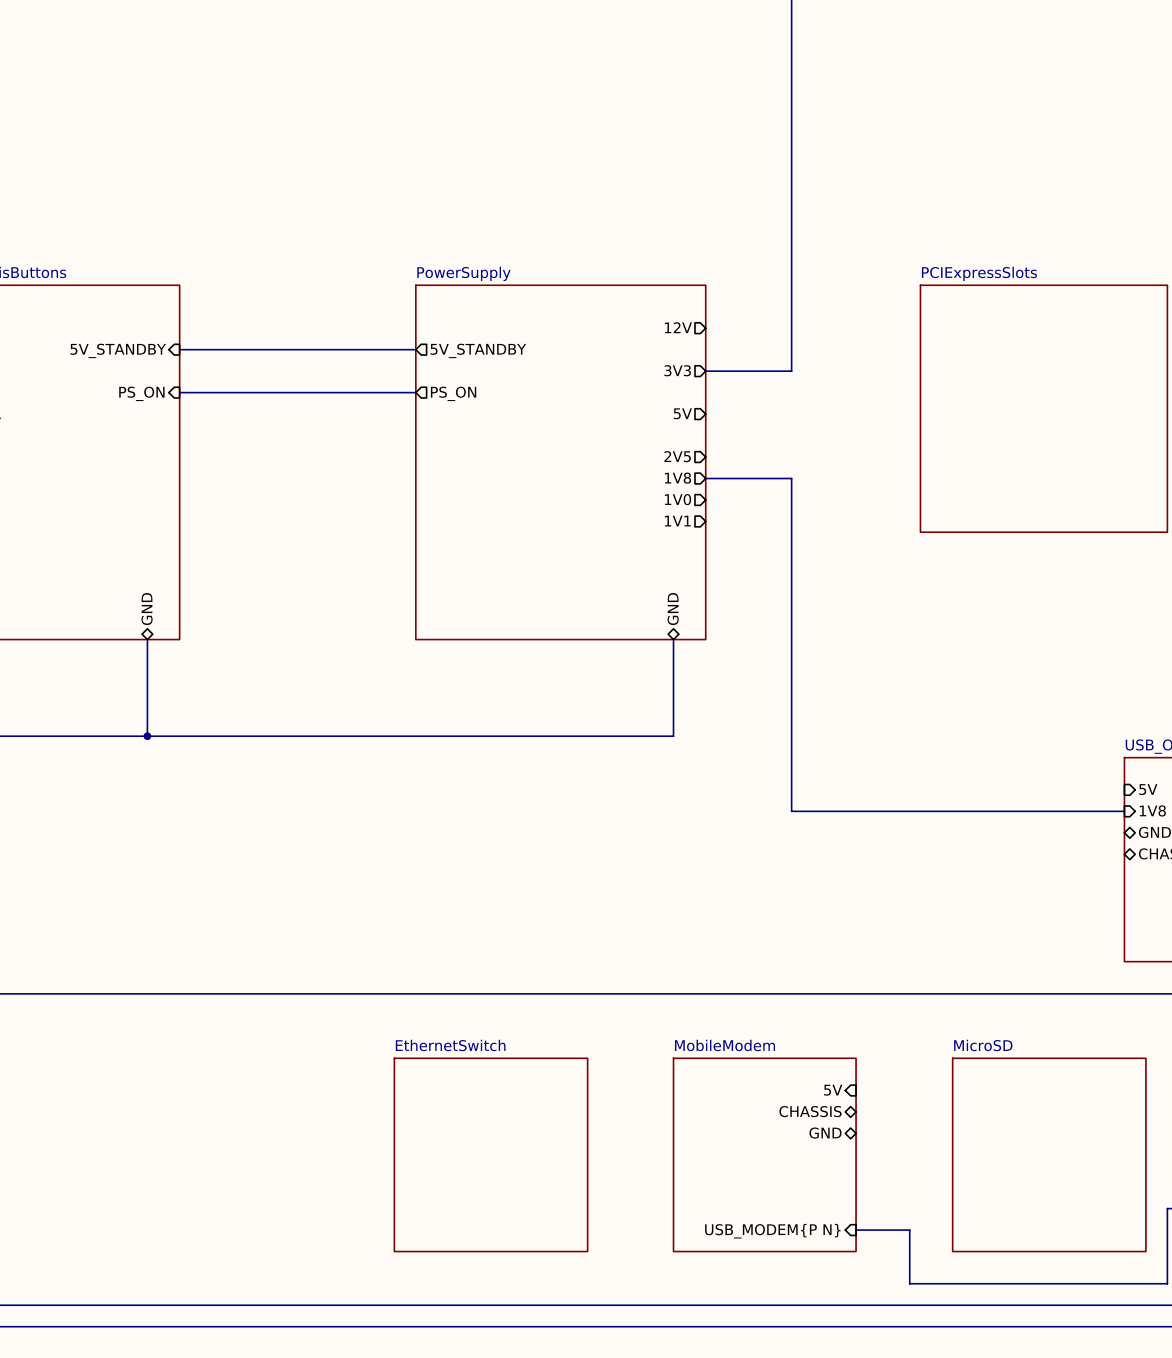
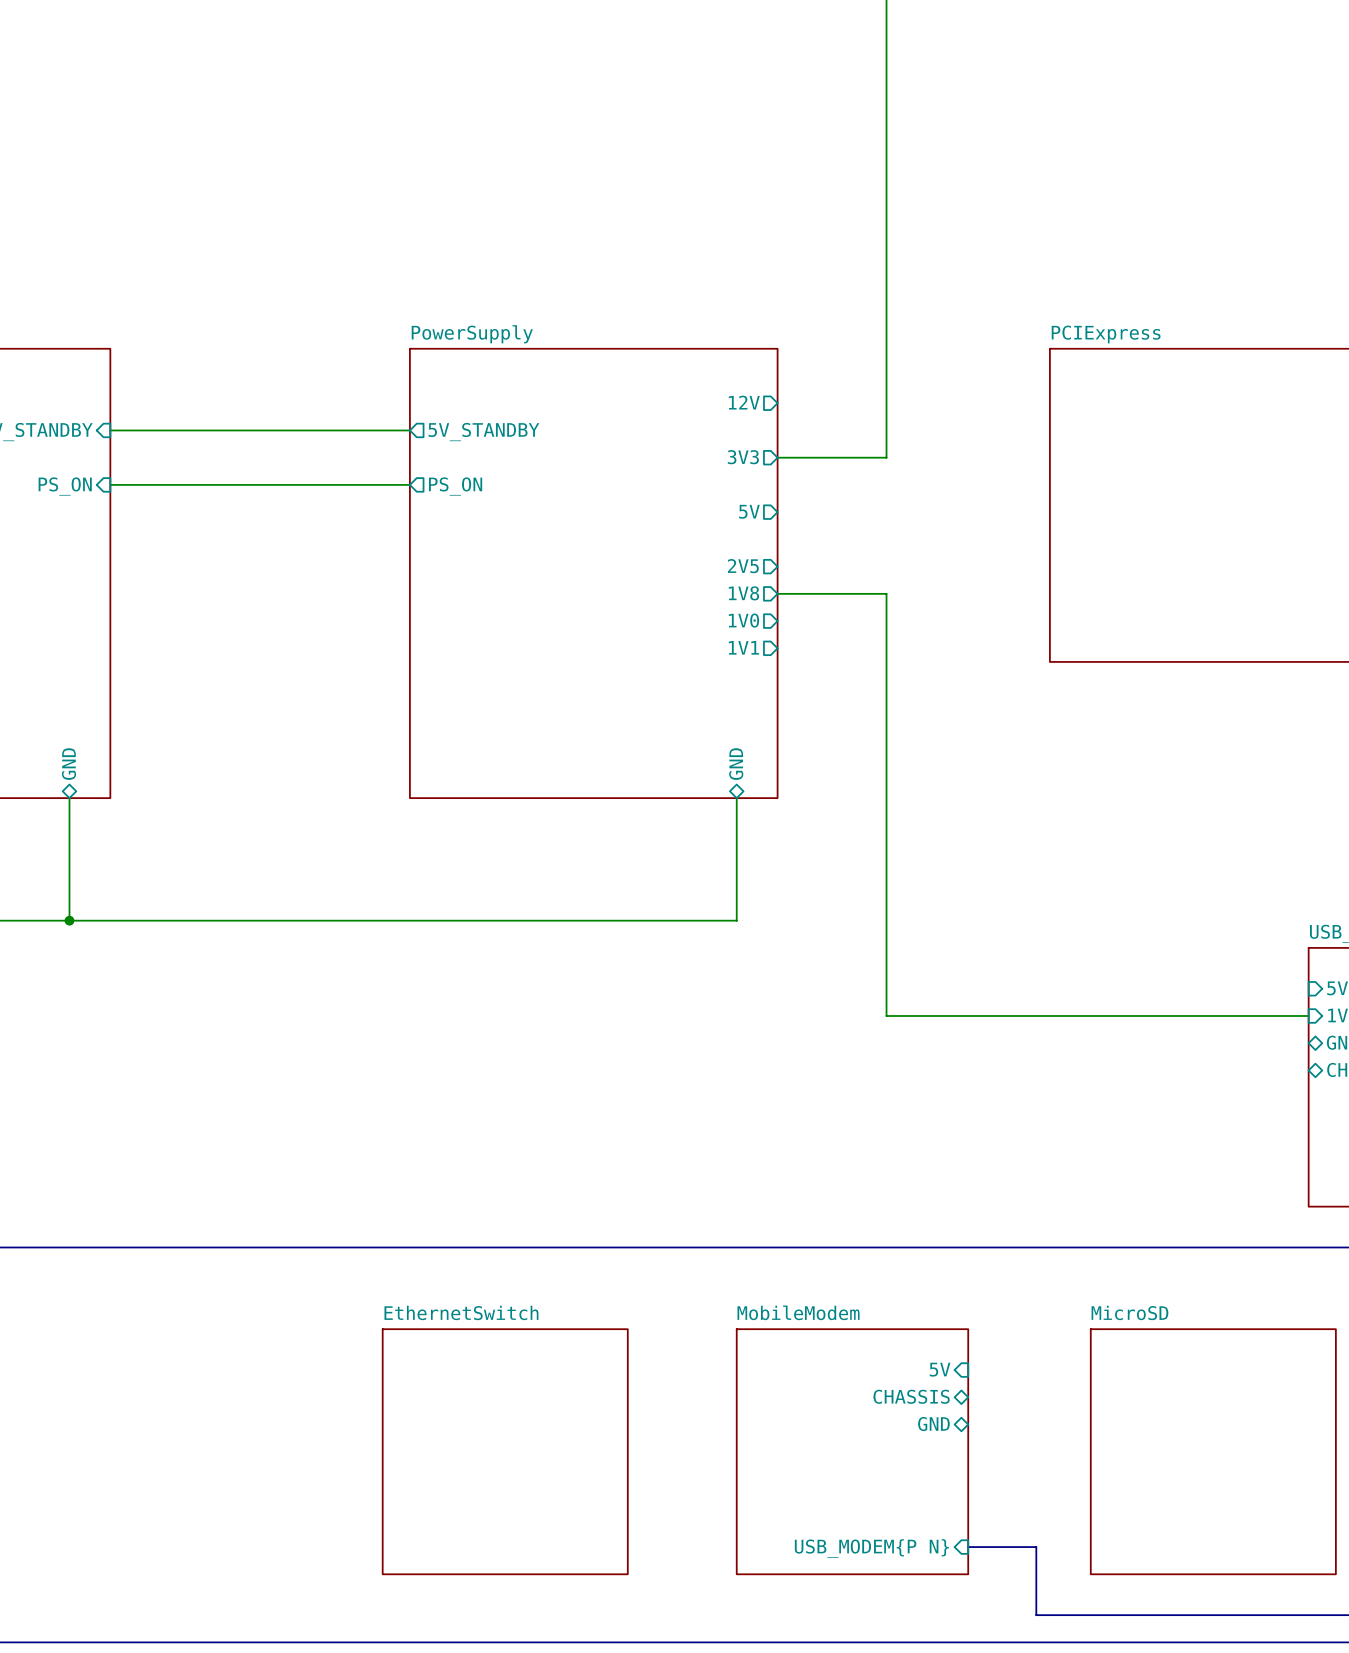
sheet PCIExpressSlots name: PCIExpressSlots (979, 273) -> PCIExpress (1106, 334)

